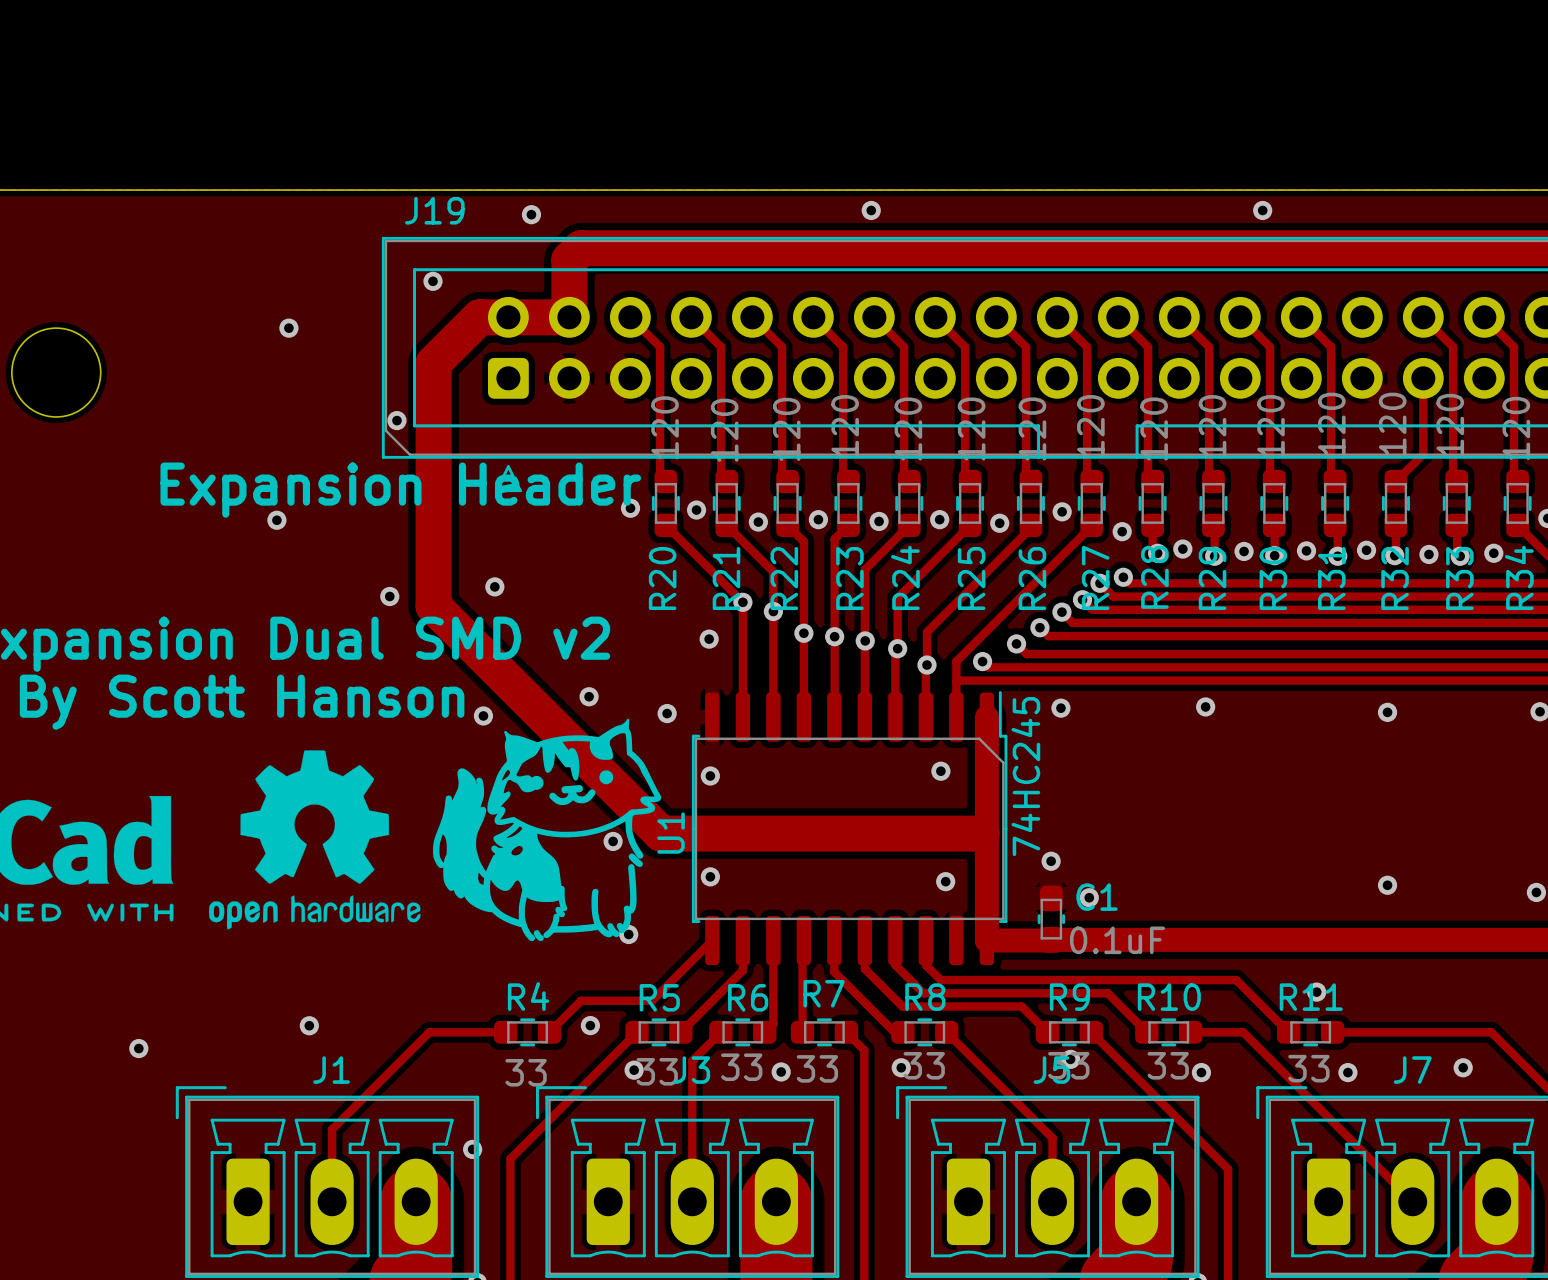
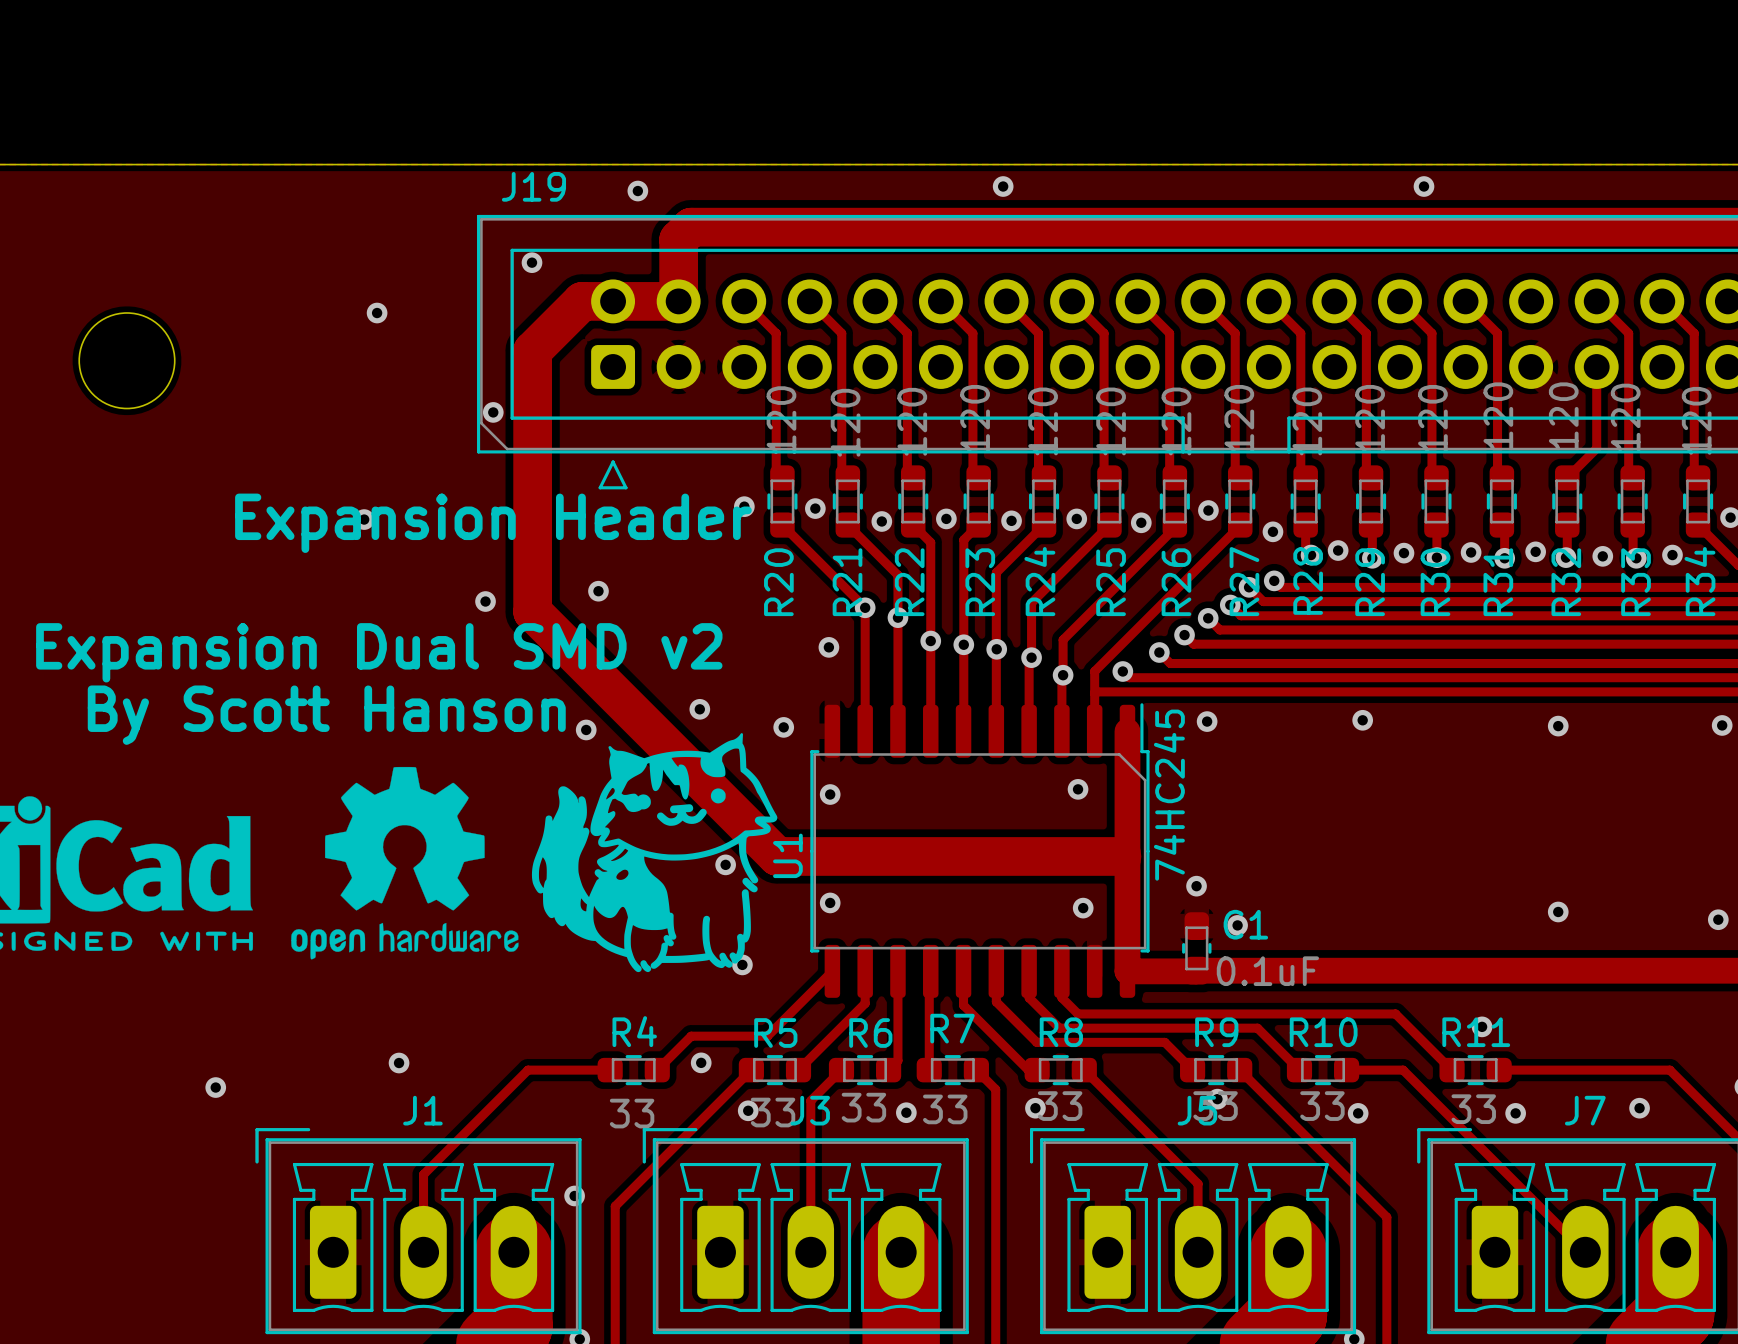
J19 value position: Expansion Header (400, 490) -> Expansion Header (493, 523)

